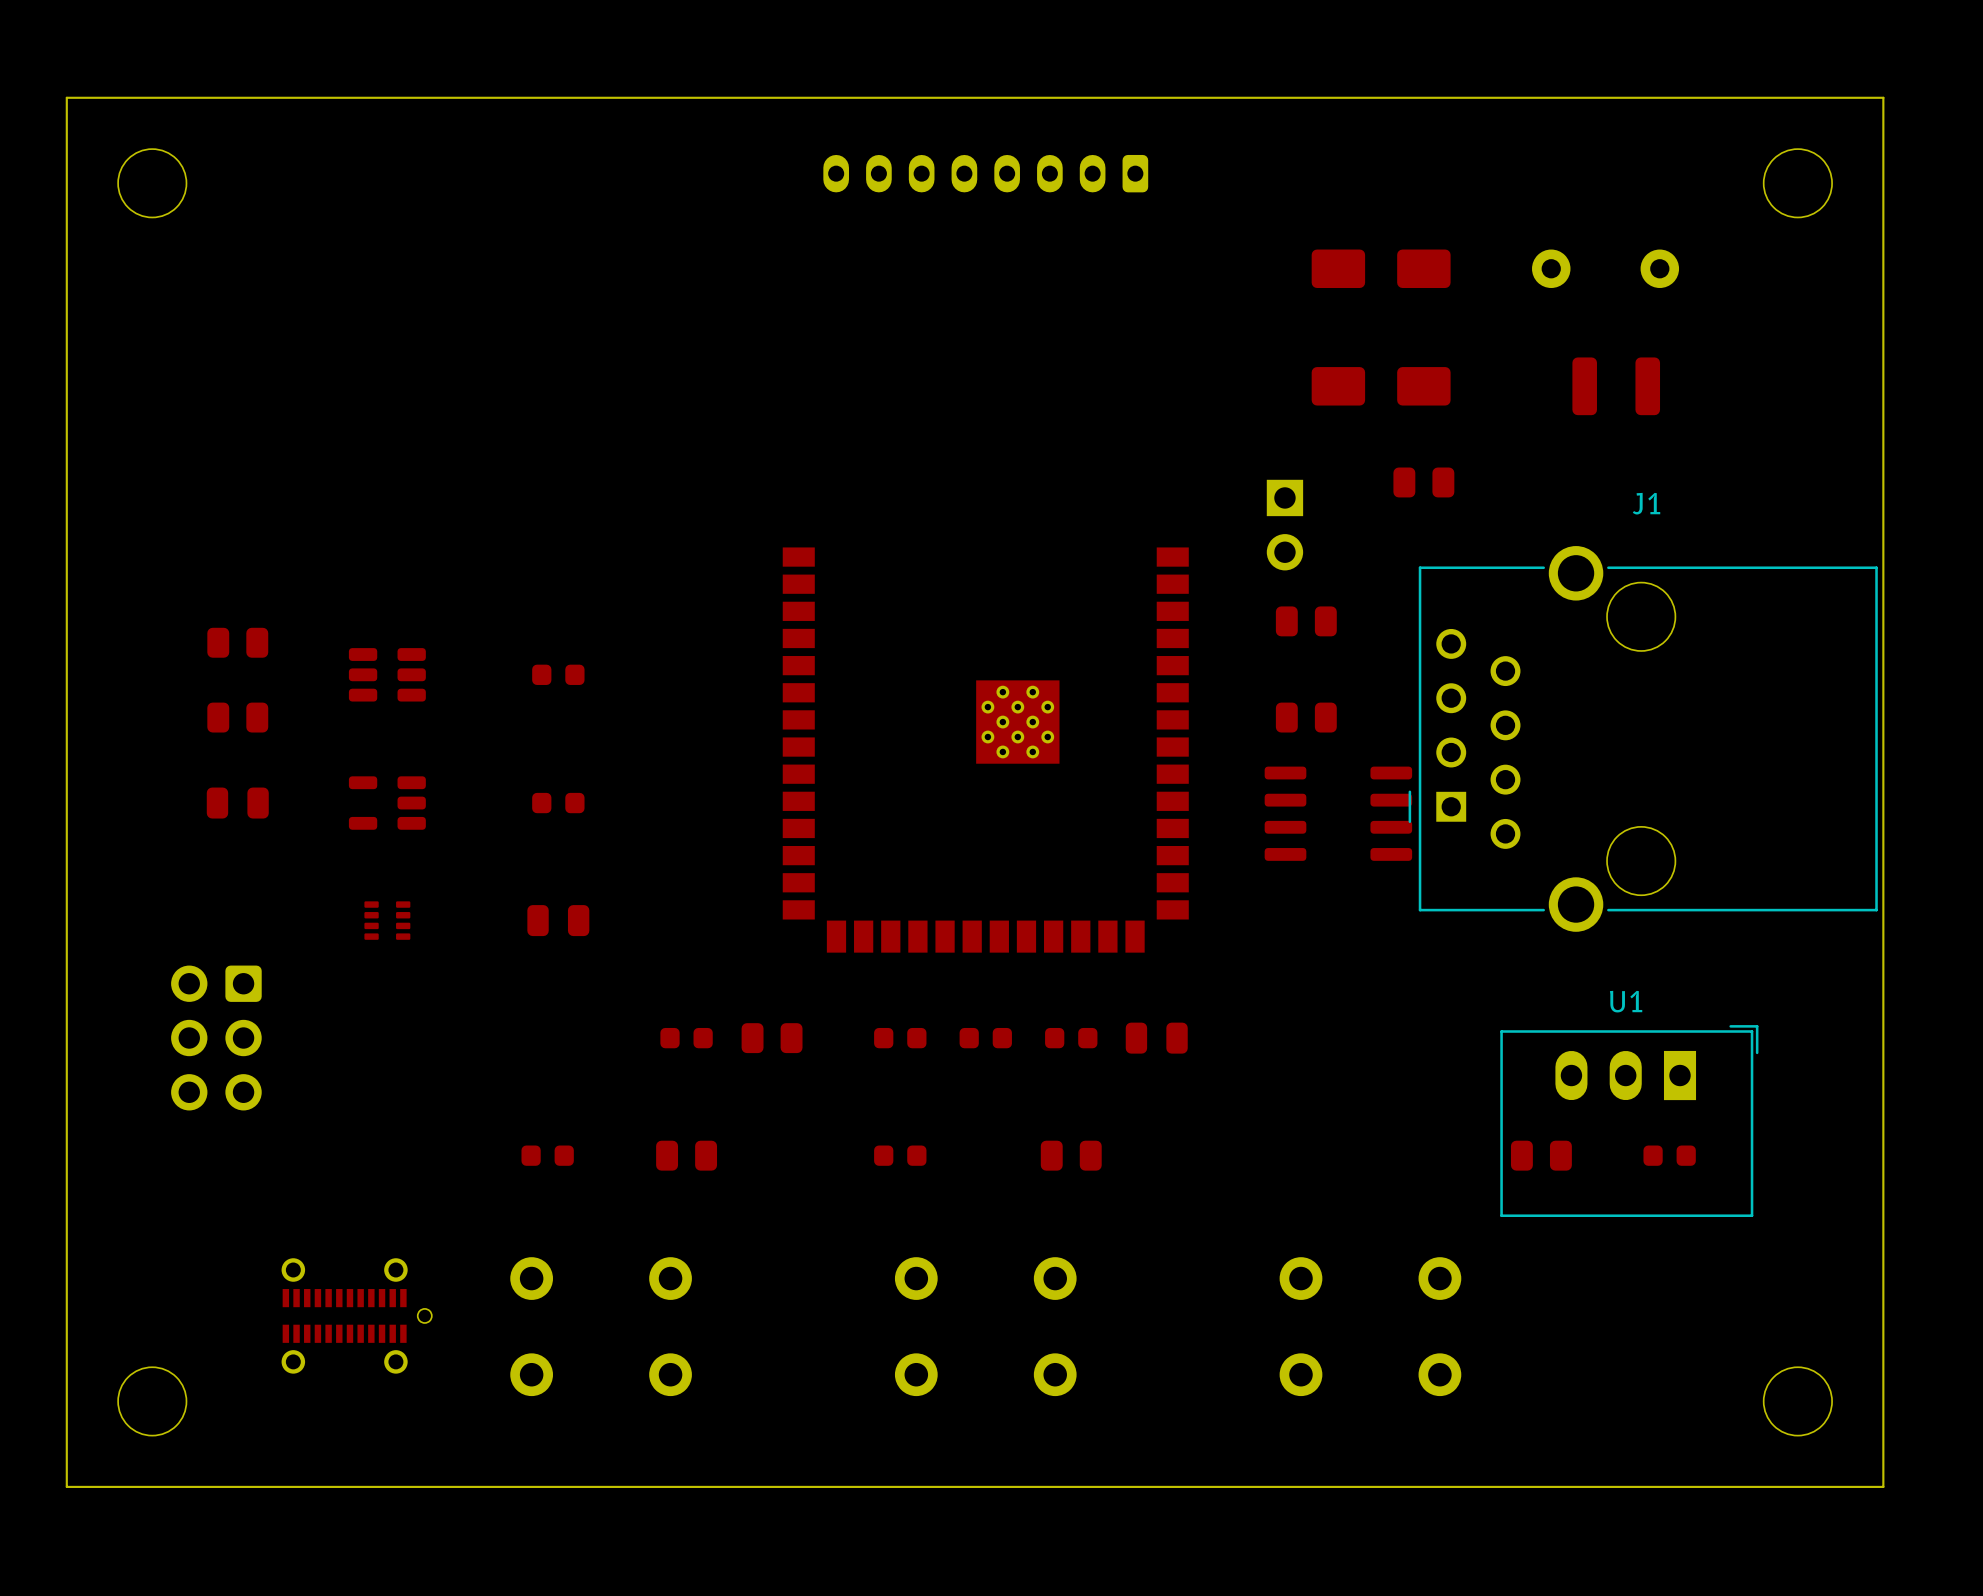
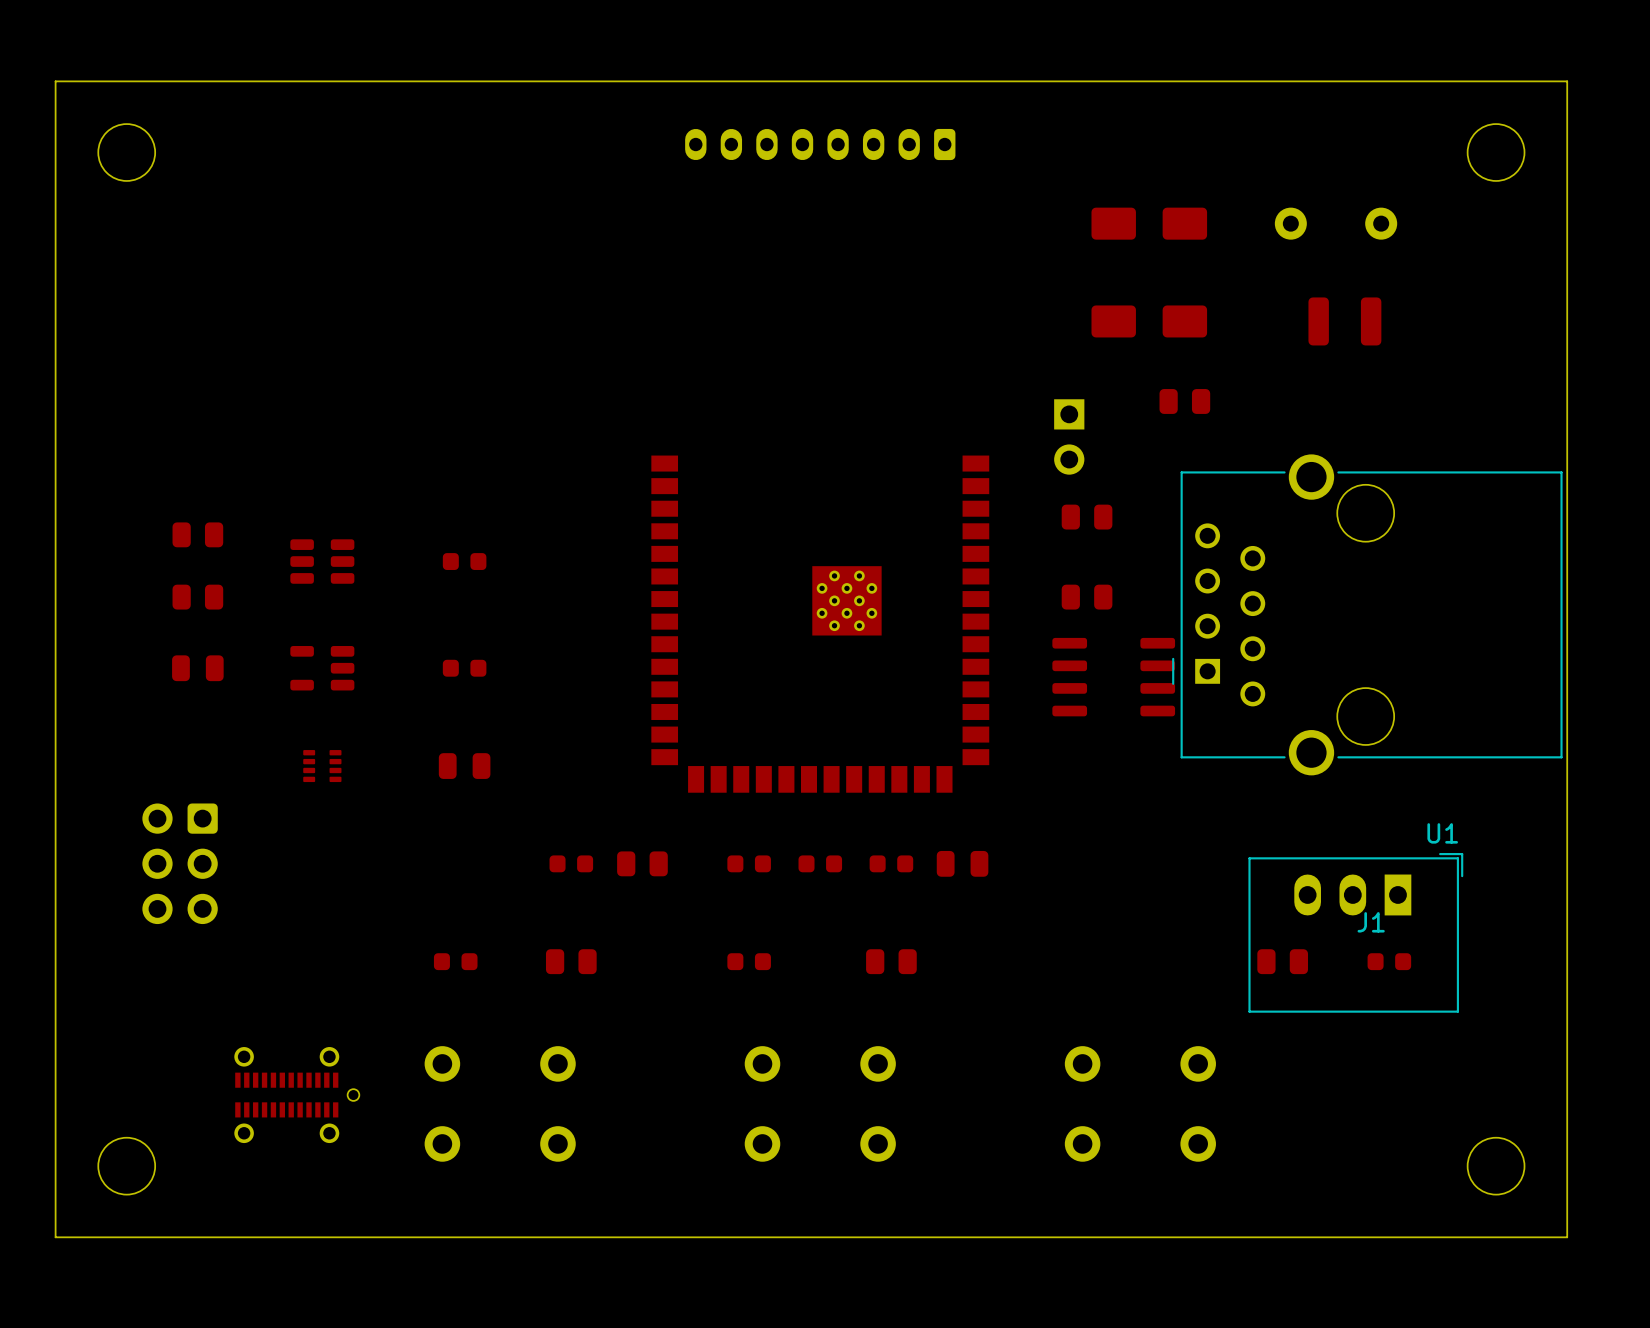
J1 name position: J1 (1646, 503) -> J1 (1371, 922)
U1 name position: U1 (1626, 1001) -> U1 (1442, 833)

